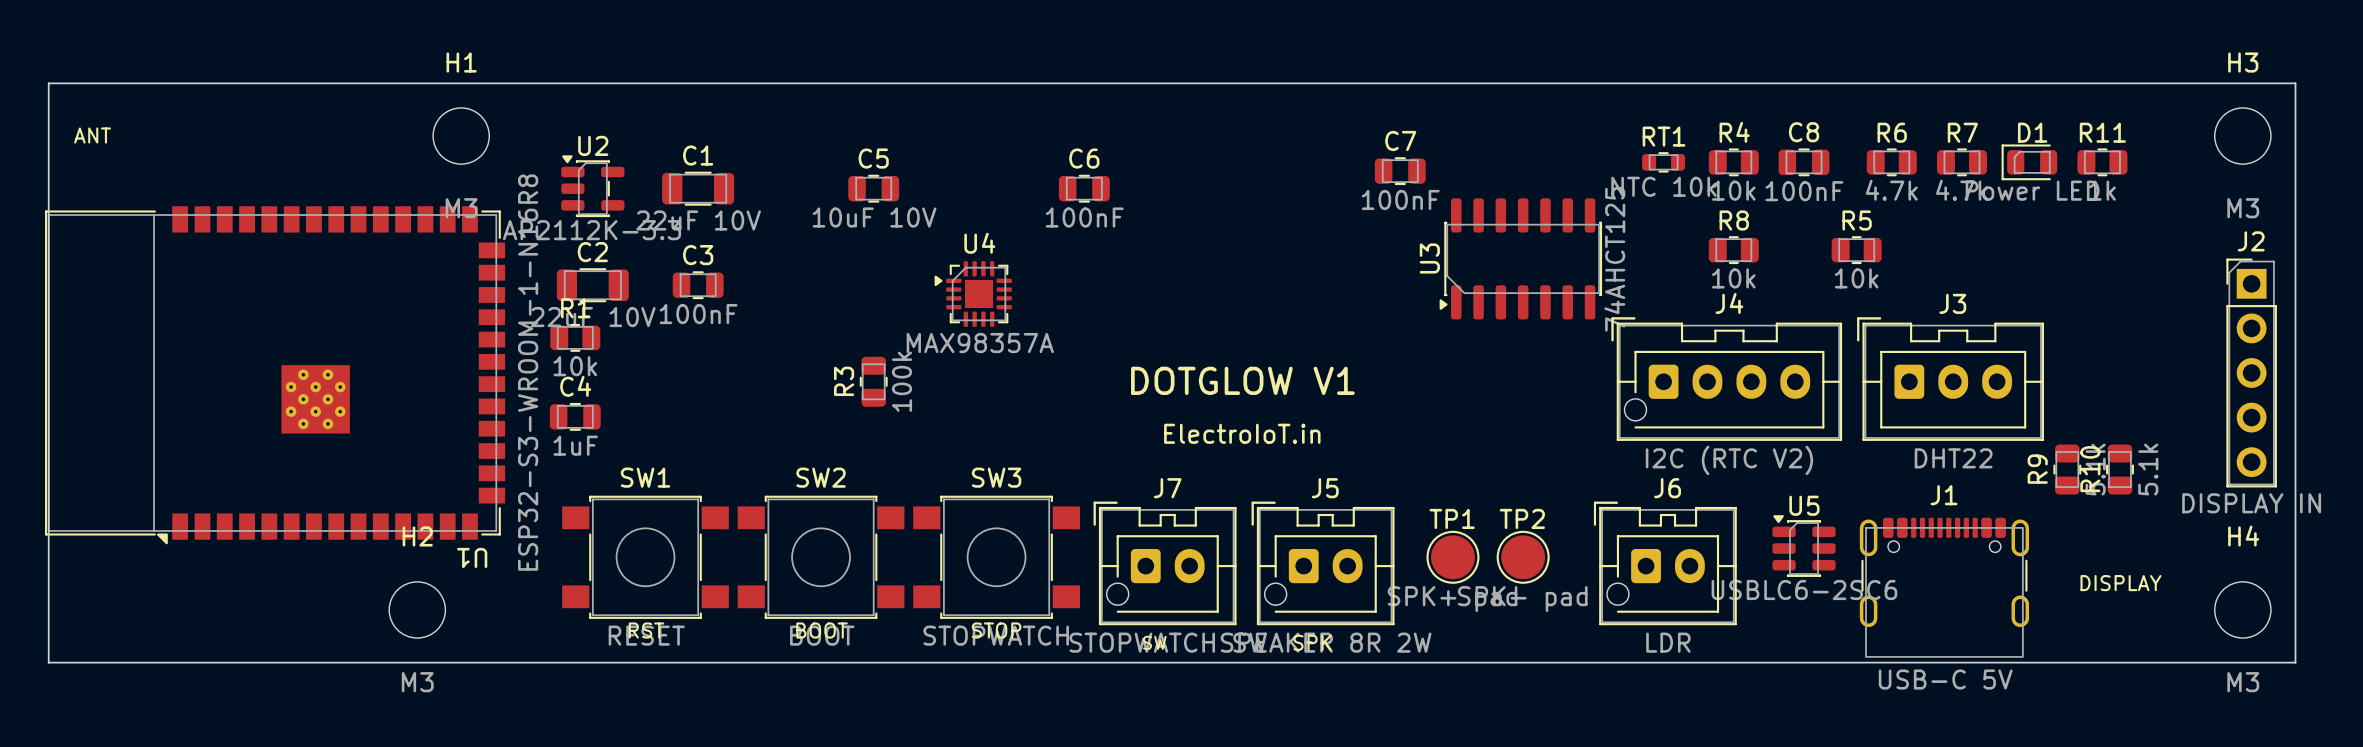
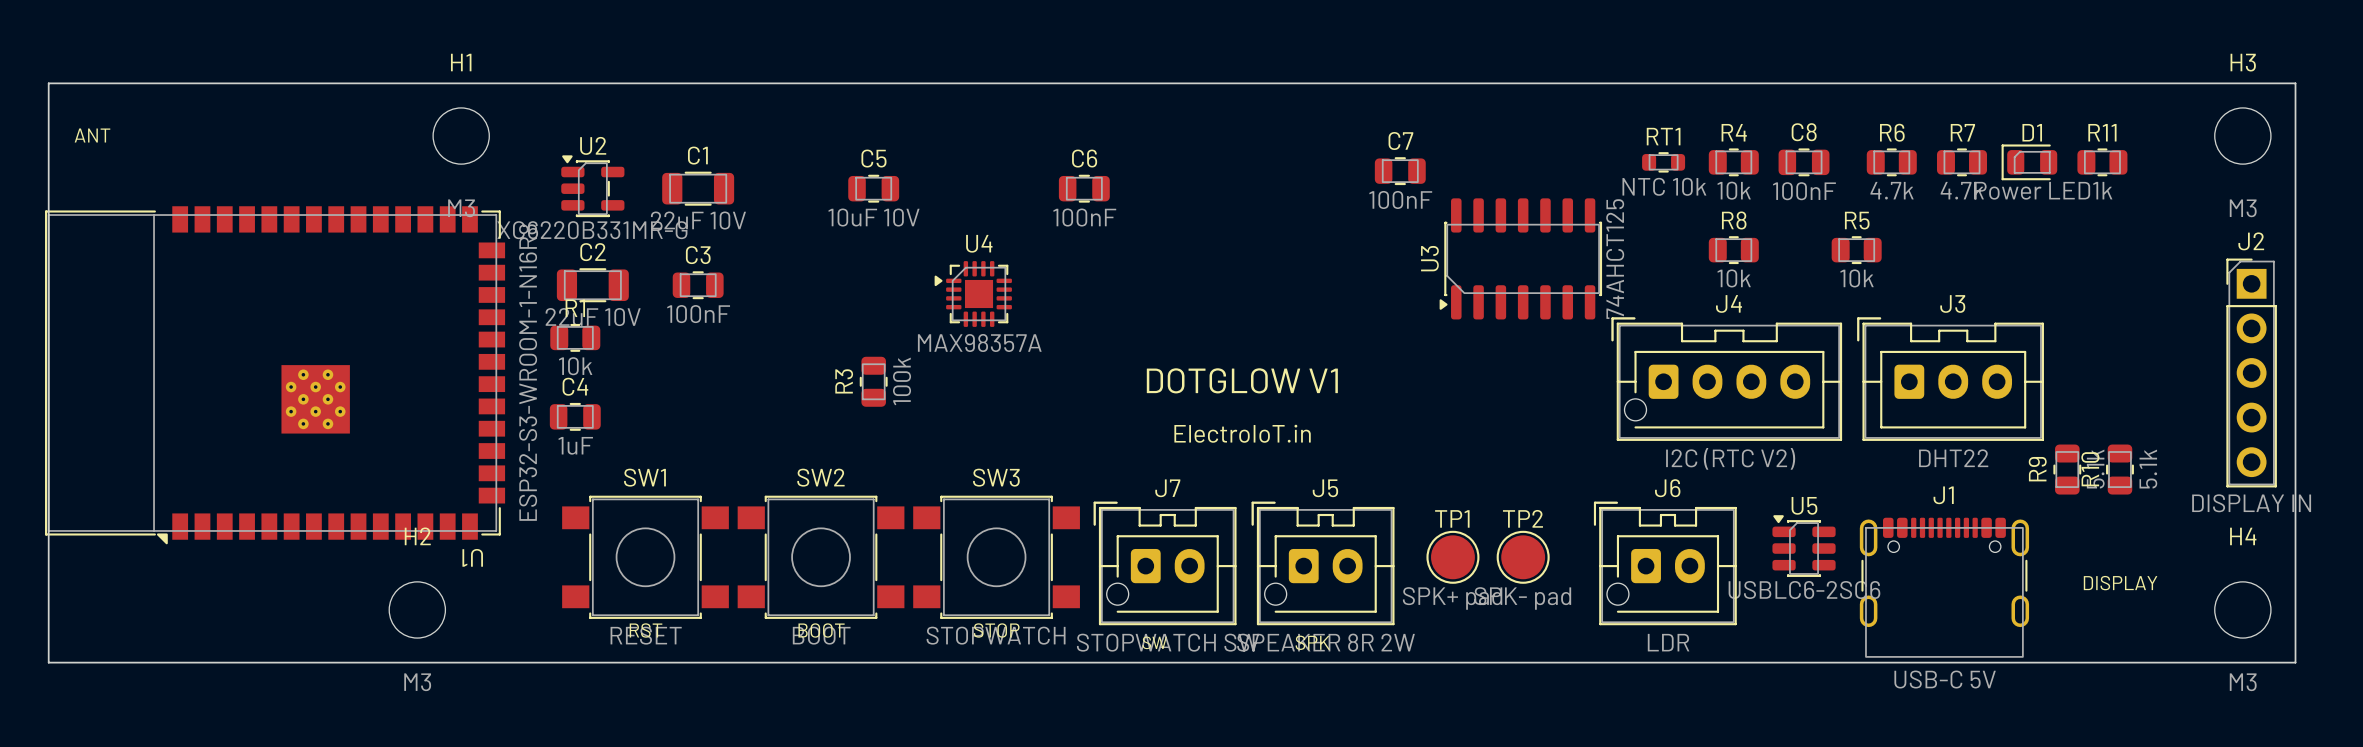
U2 value: AP2112K-3.3 (592, 230) -> XC6220B331MR-G (592, 230)

